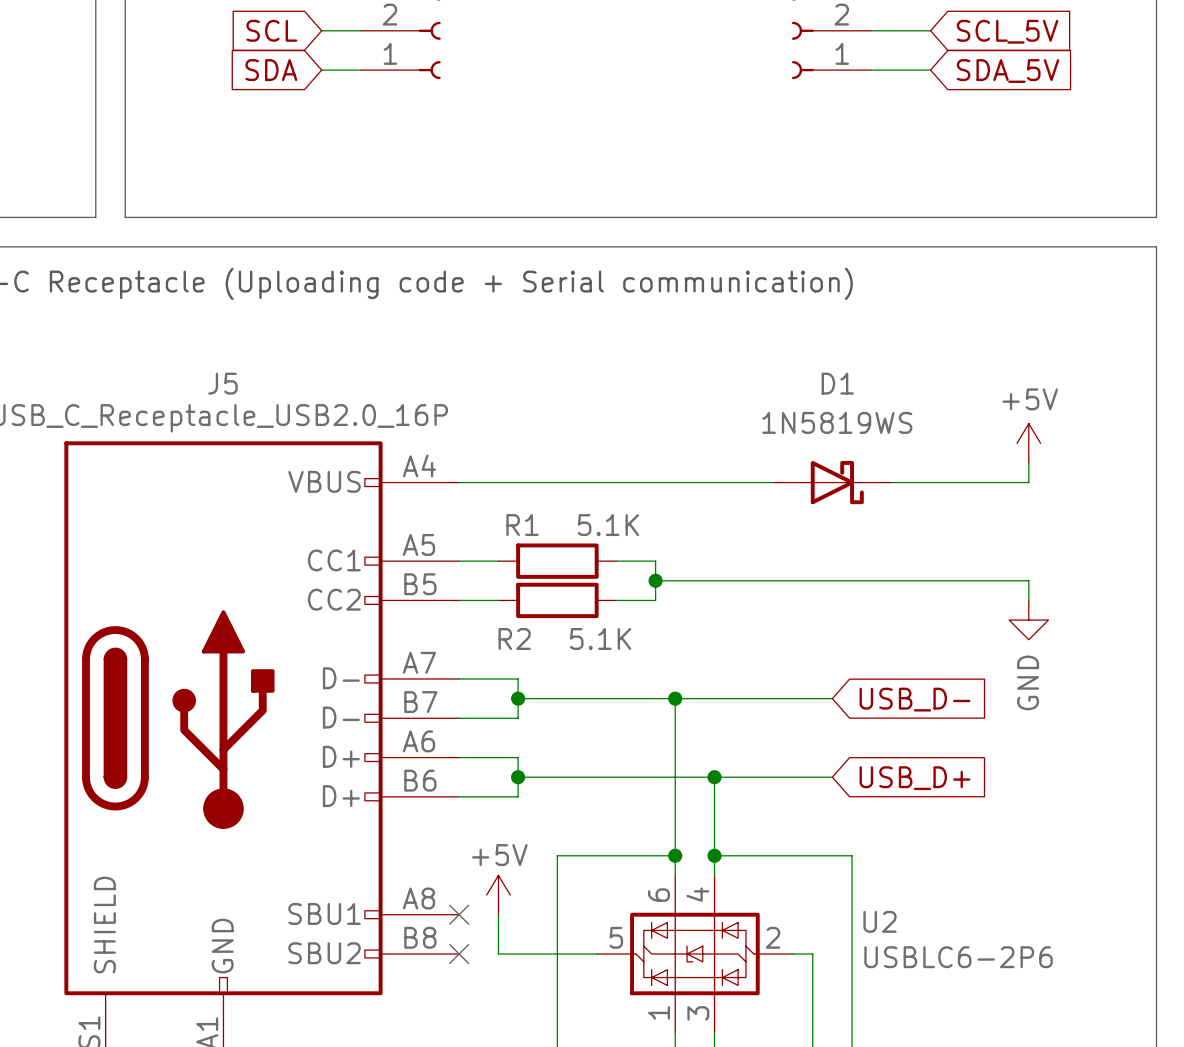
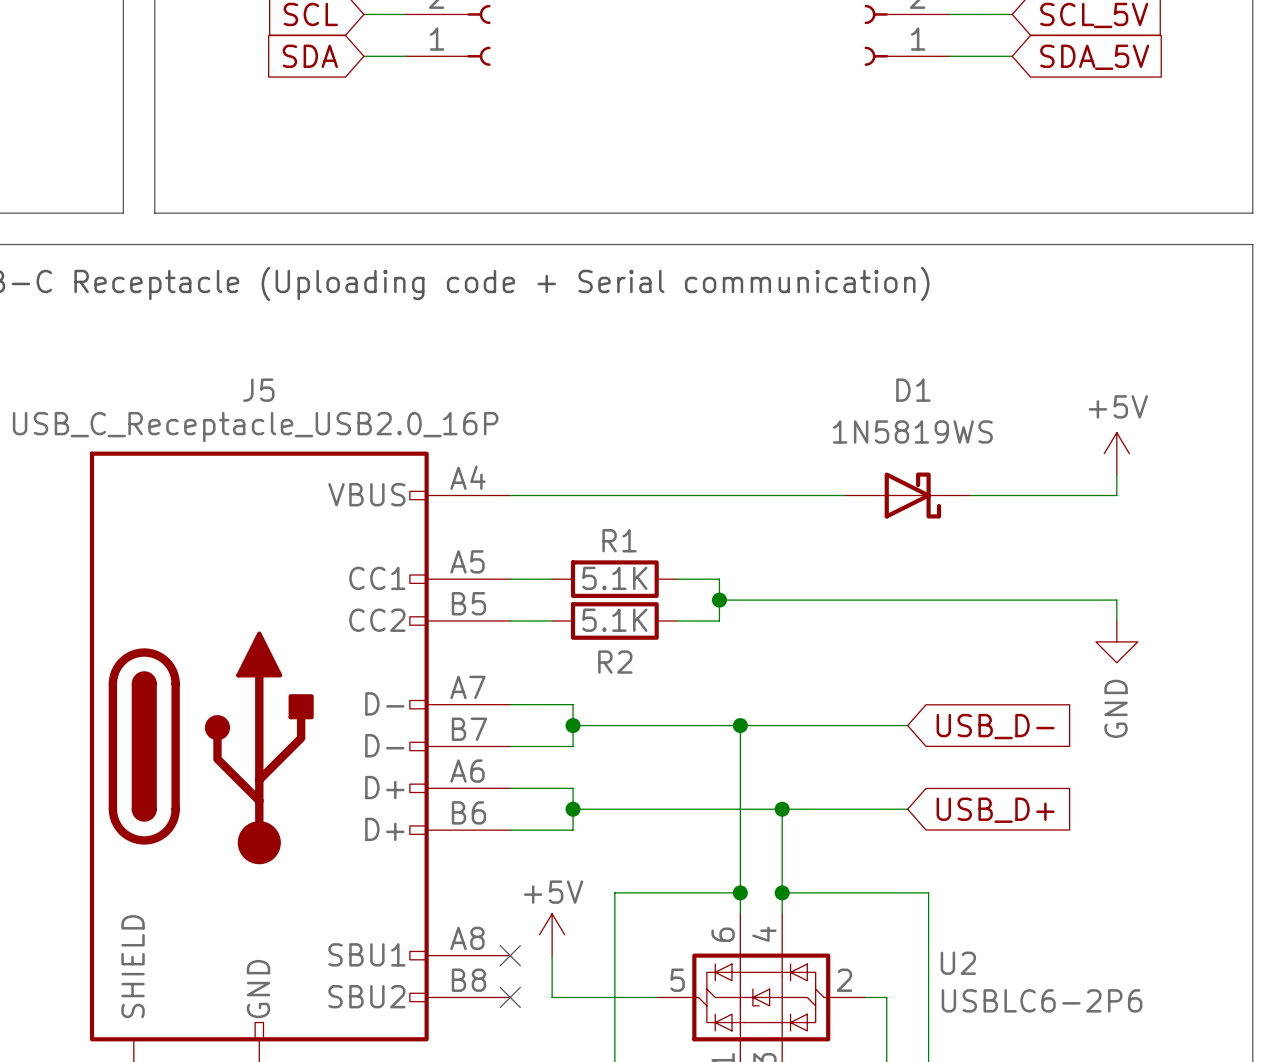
R1 name position: R1 (522, 525) -> R1 (619, 540)
R1 value position: 5.1K (608, 525) -> 5.1K (614, 578)
R2 name position: R2 (514, 638) -> R2 (615, 662)
R2 value position: 5.1K (600, 638) -> 5.1K (614, 620)

